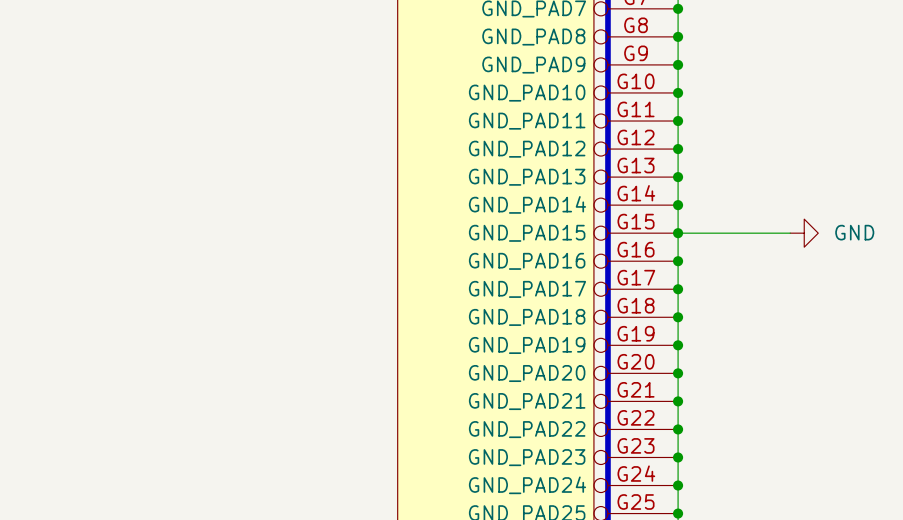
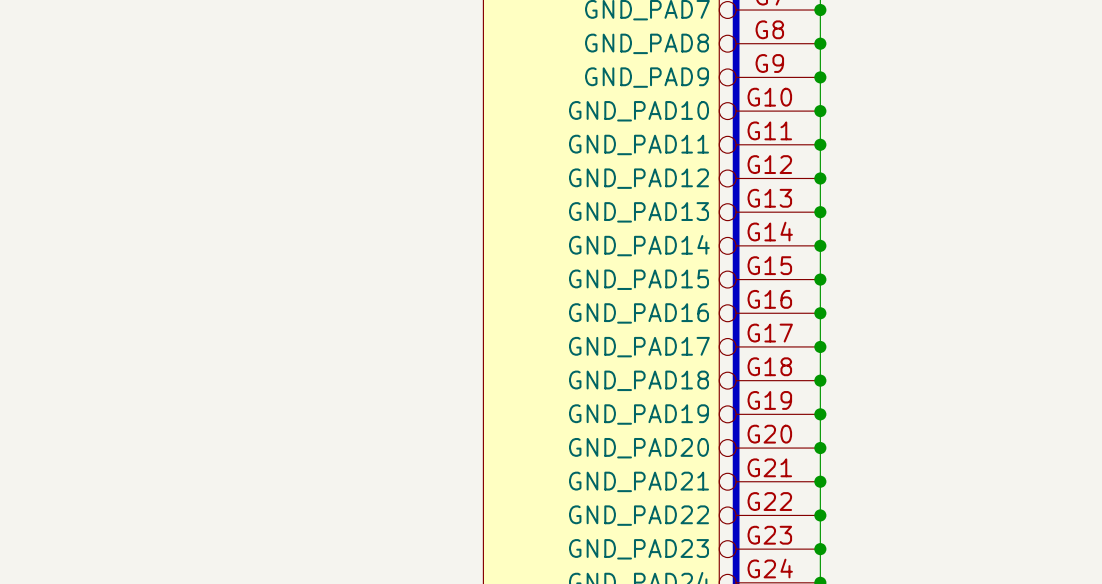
wire: (678, 233) (790, 233) -> none
power symbol: GND (804, 233) -> none

